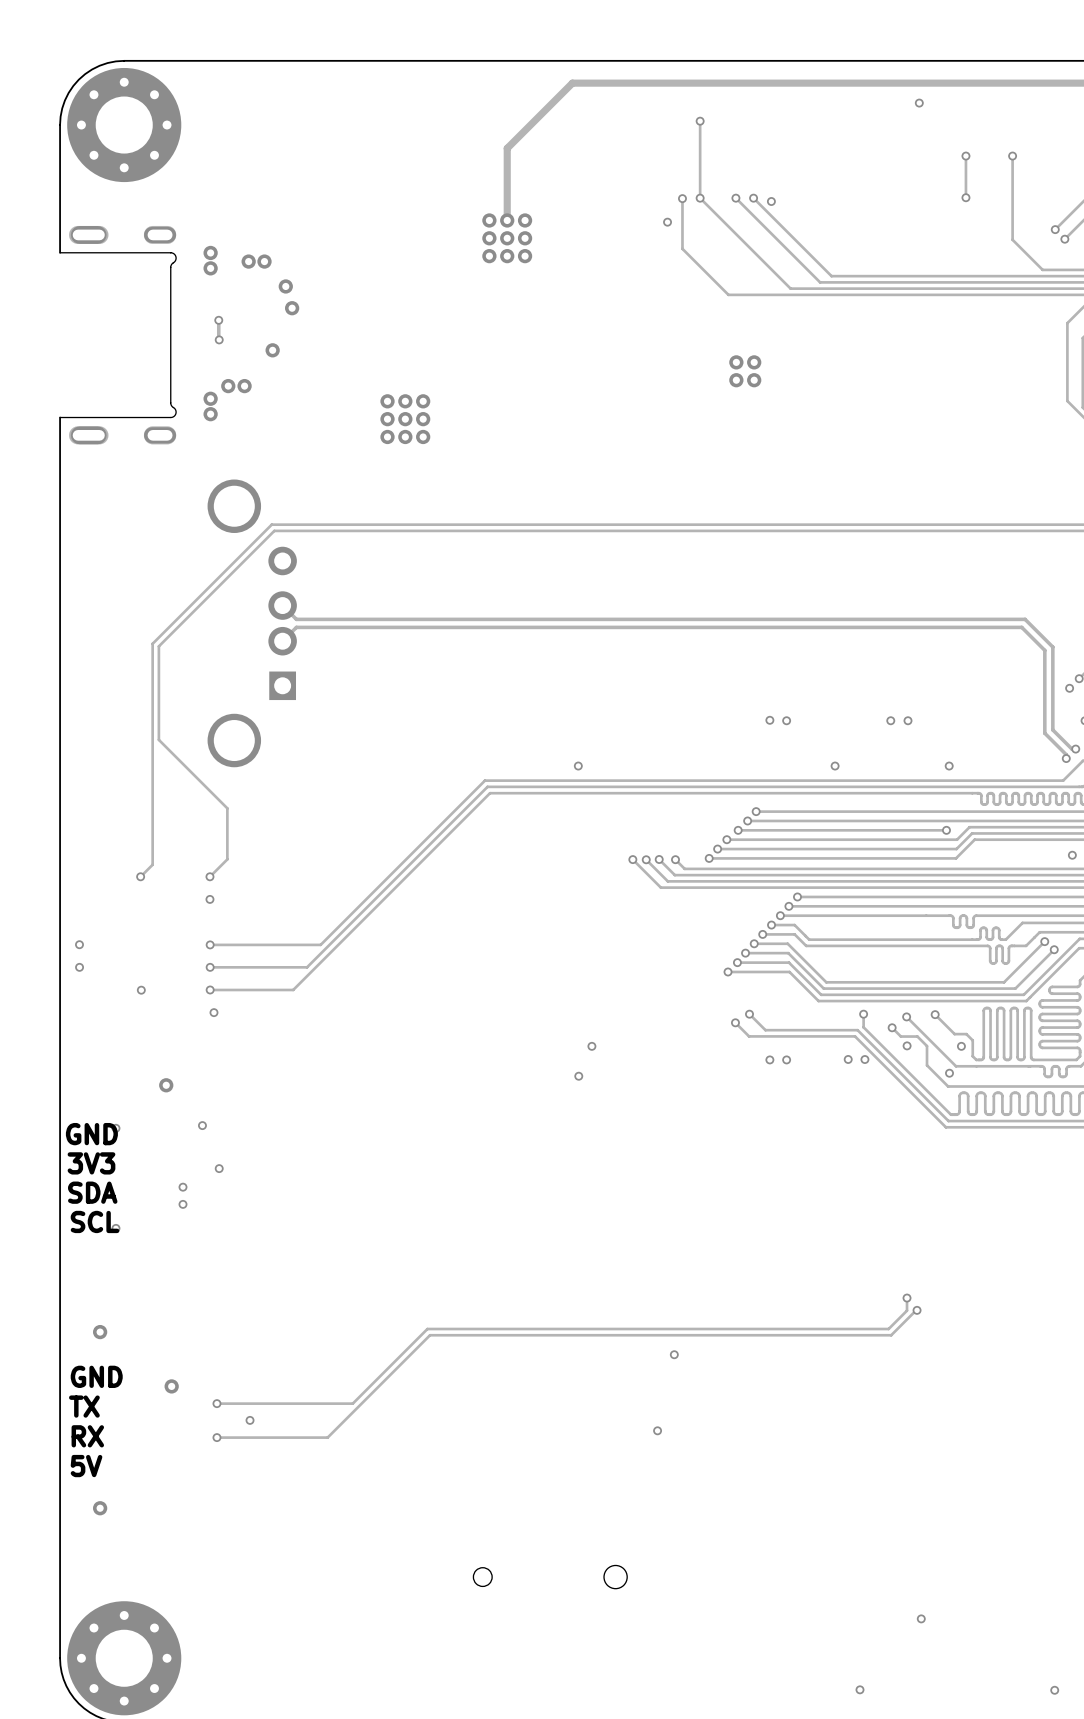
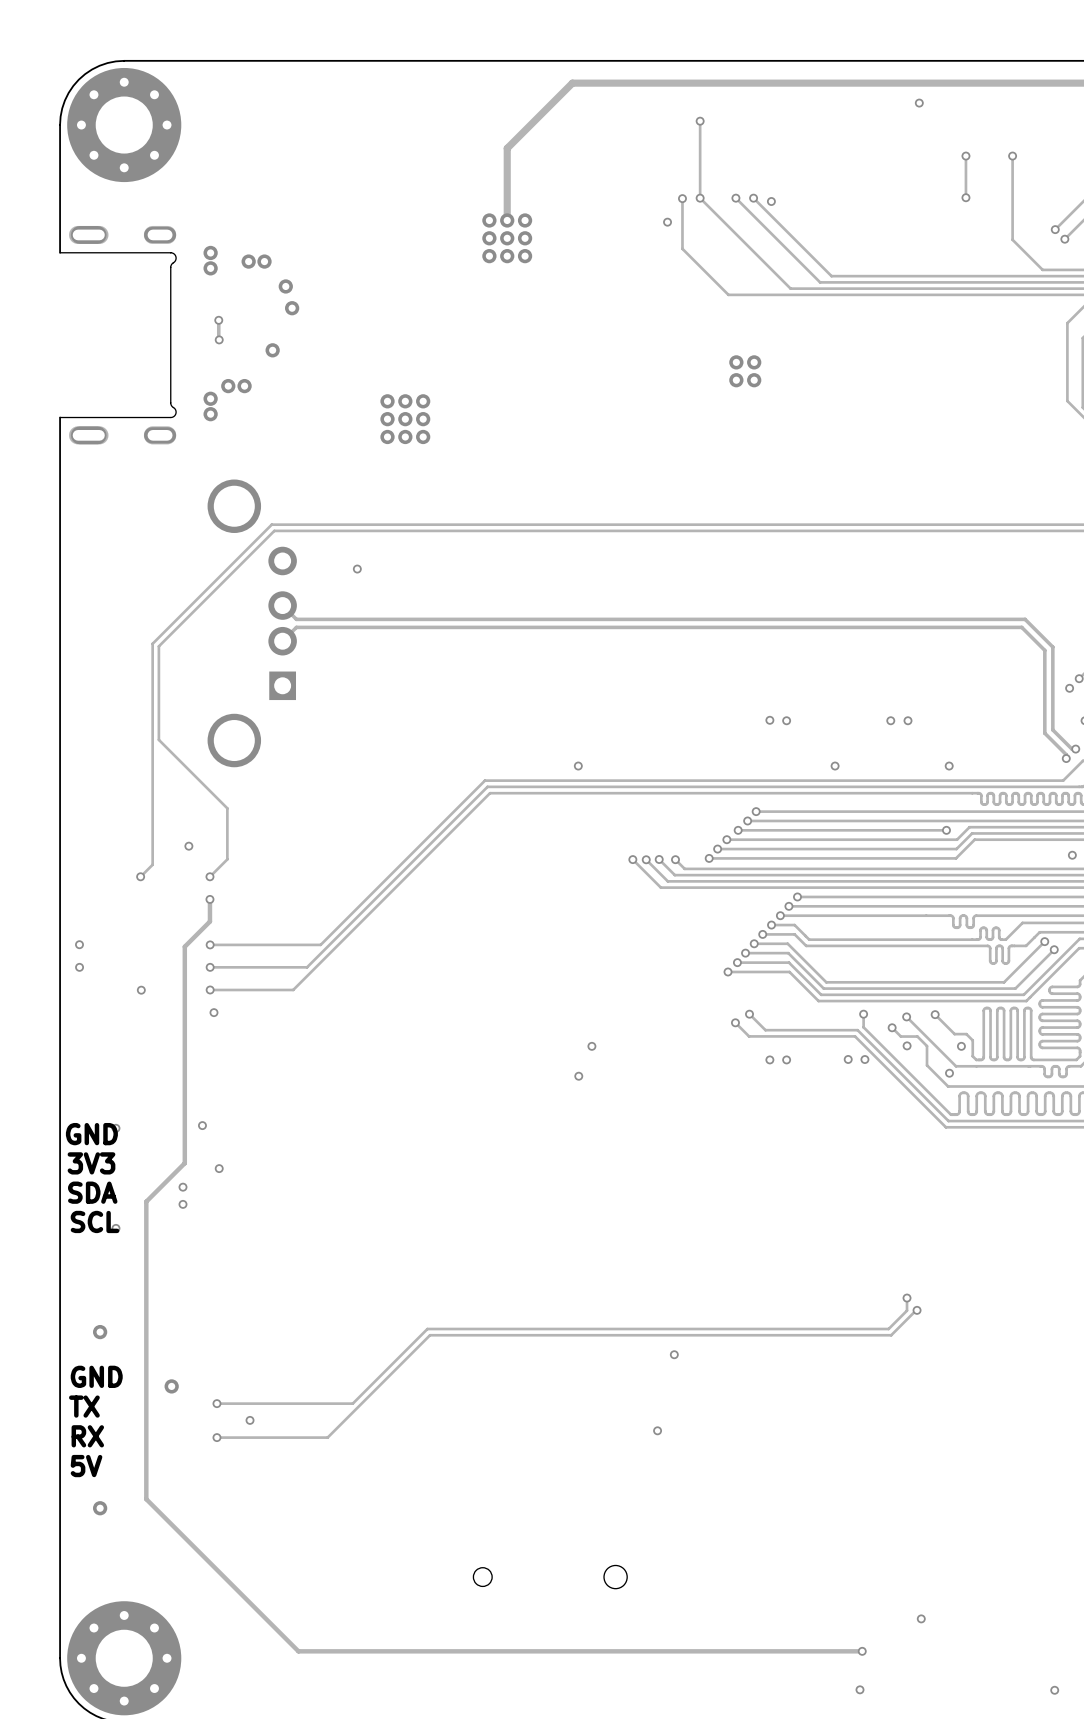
via: none -> (357, 569)
via: none -> (188, 846)
track: none -> (209, 899) (209, 921) (184, 946) (184, 1163) (146, 1201) (146, 1499) (298, 1651) (862, 1651)
via: (166, 1085) -> none
via: none -> (862, 1651)

